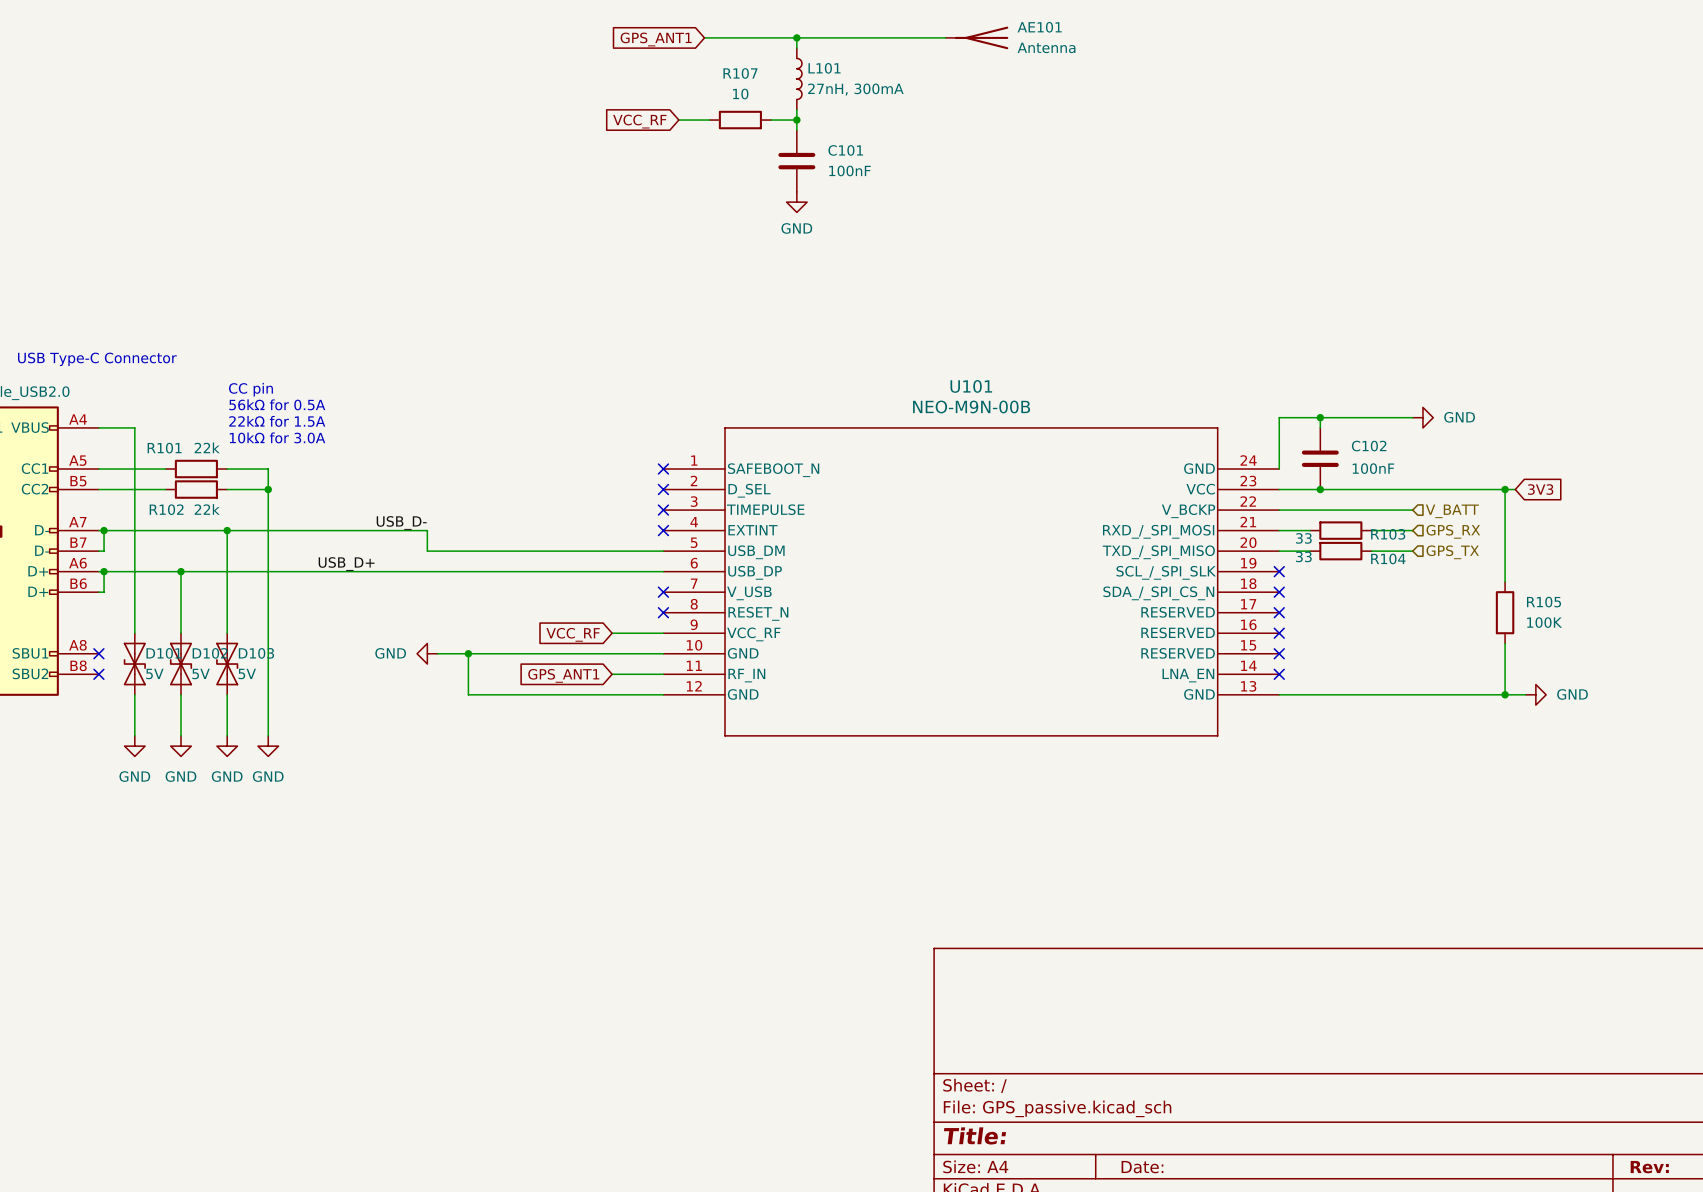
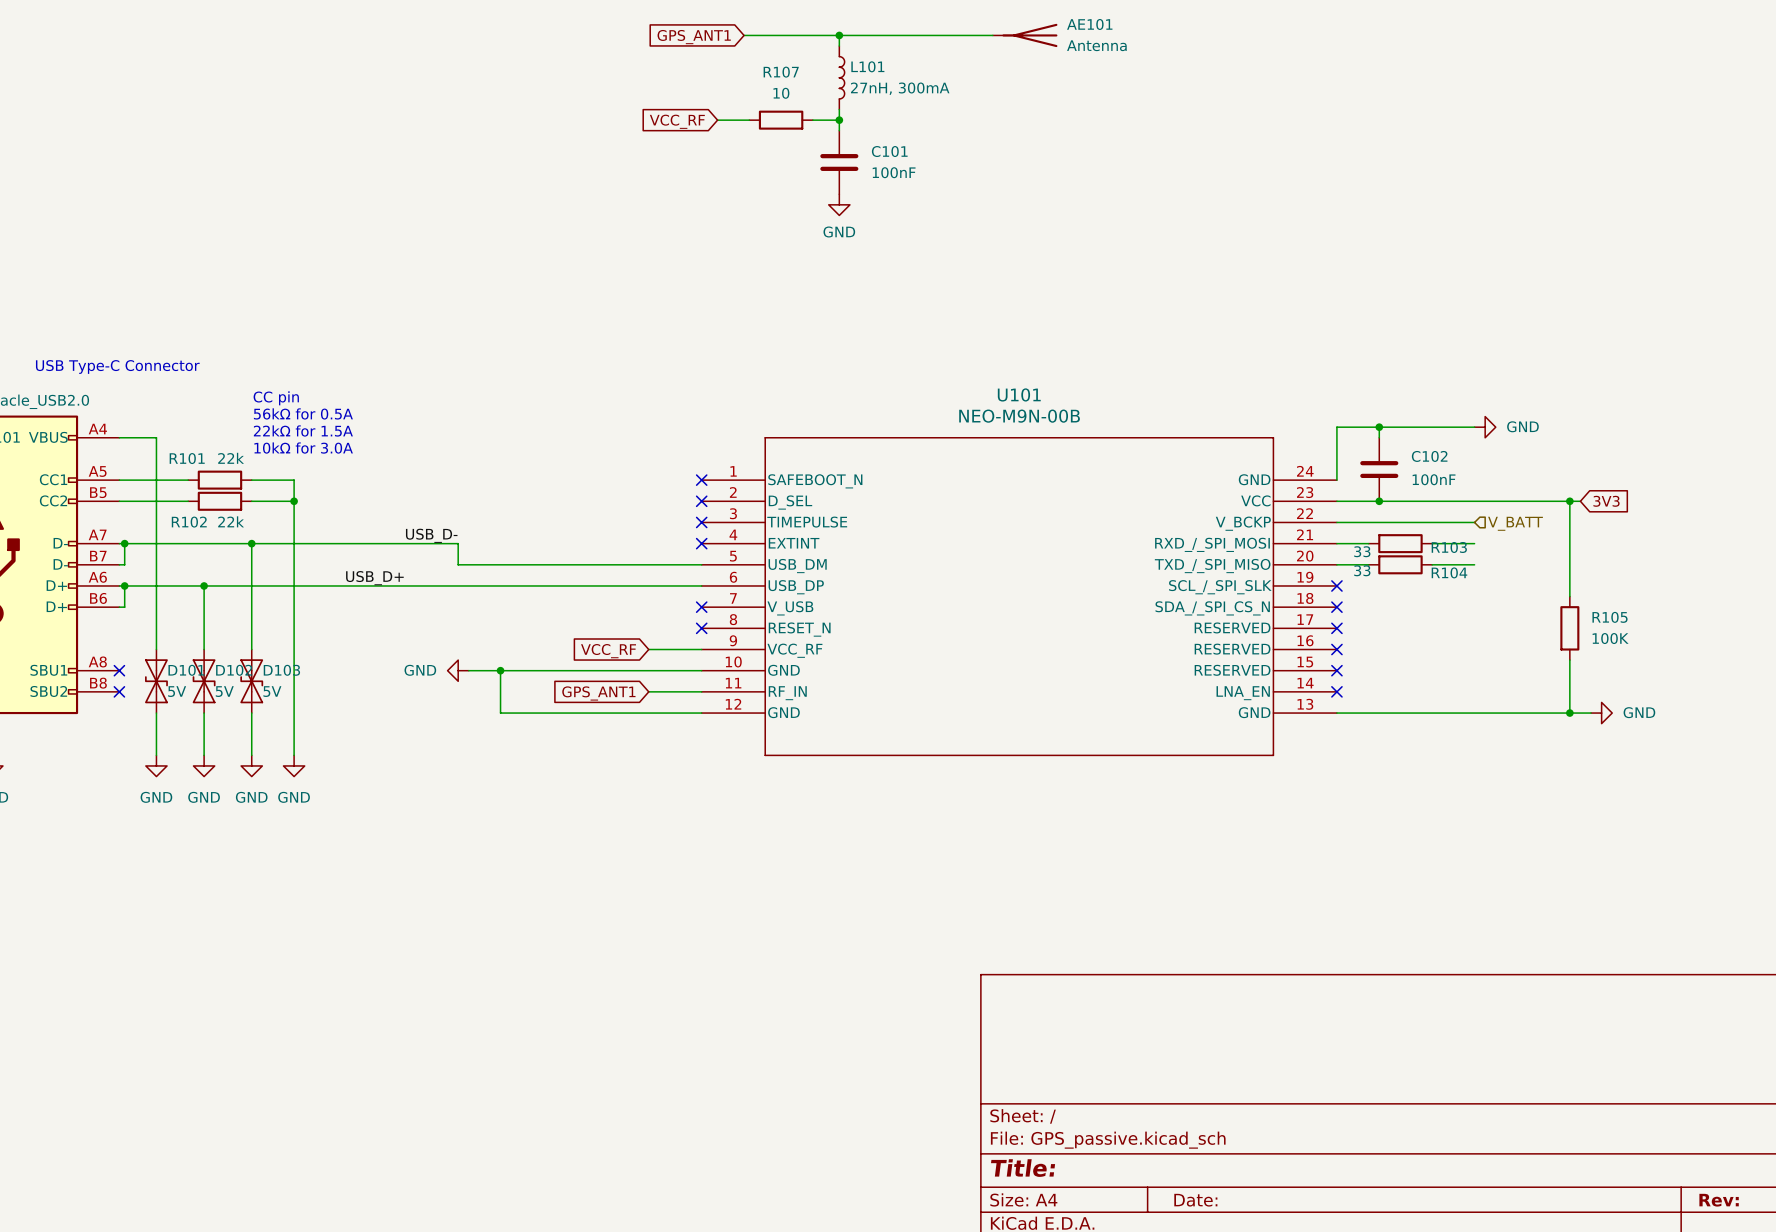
hierarchical label: GPS_RX (1453, 531) -> none
hierarchical label: GPS_TX (1452, 552) -> none

